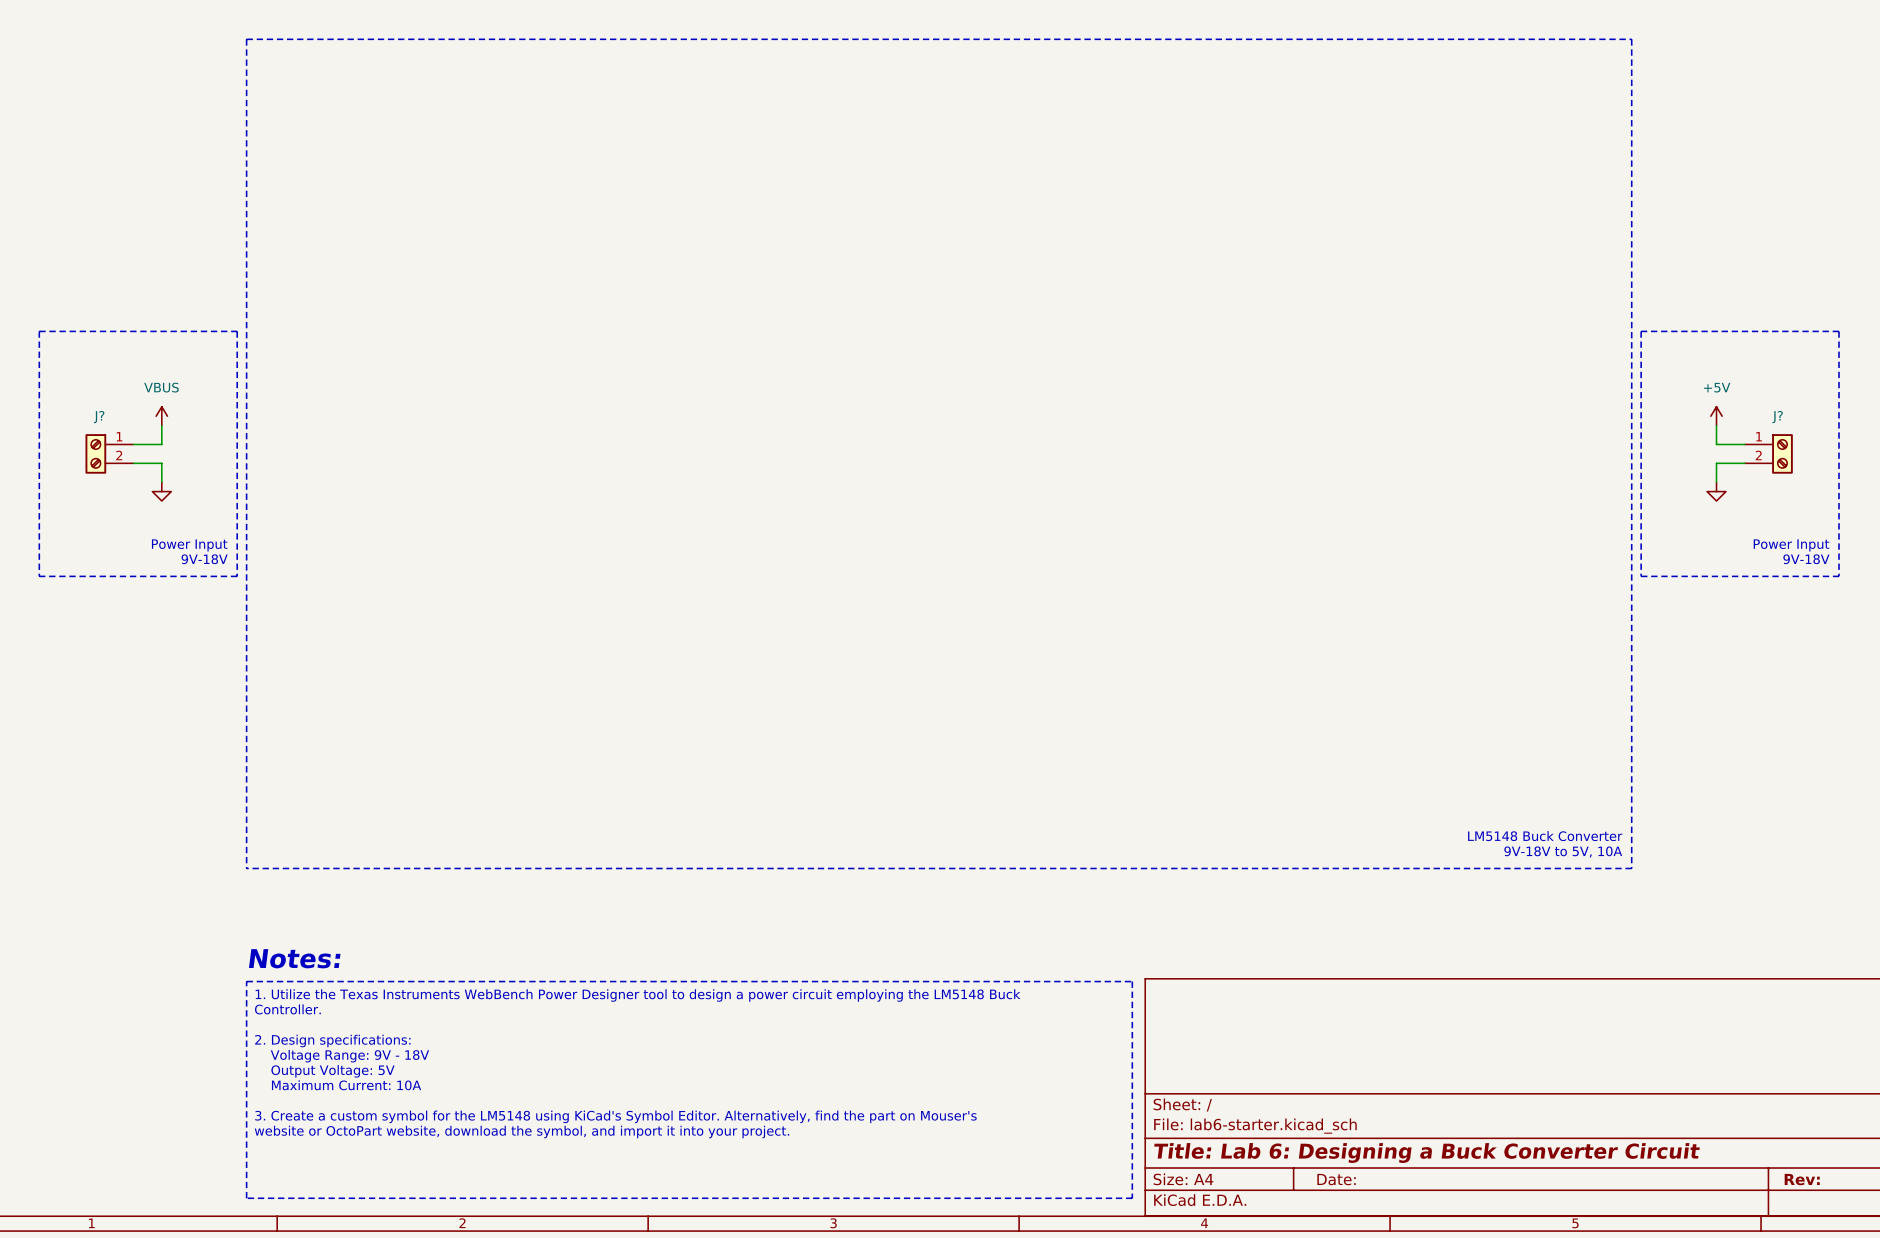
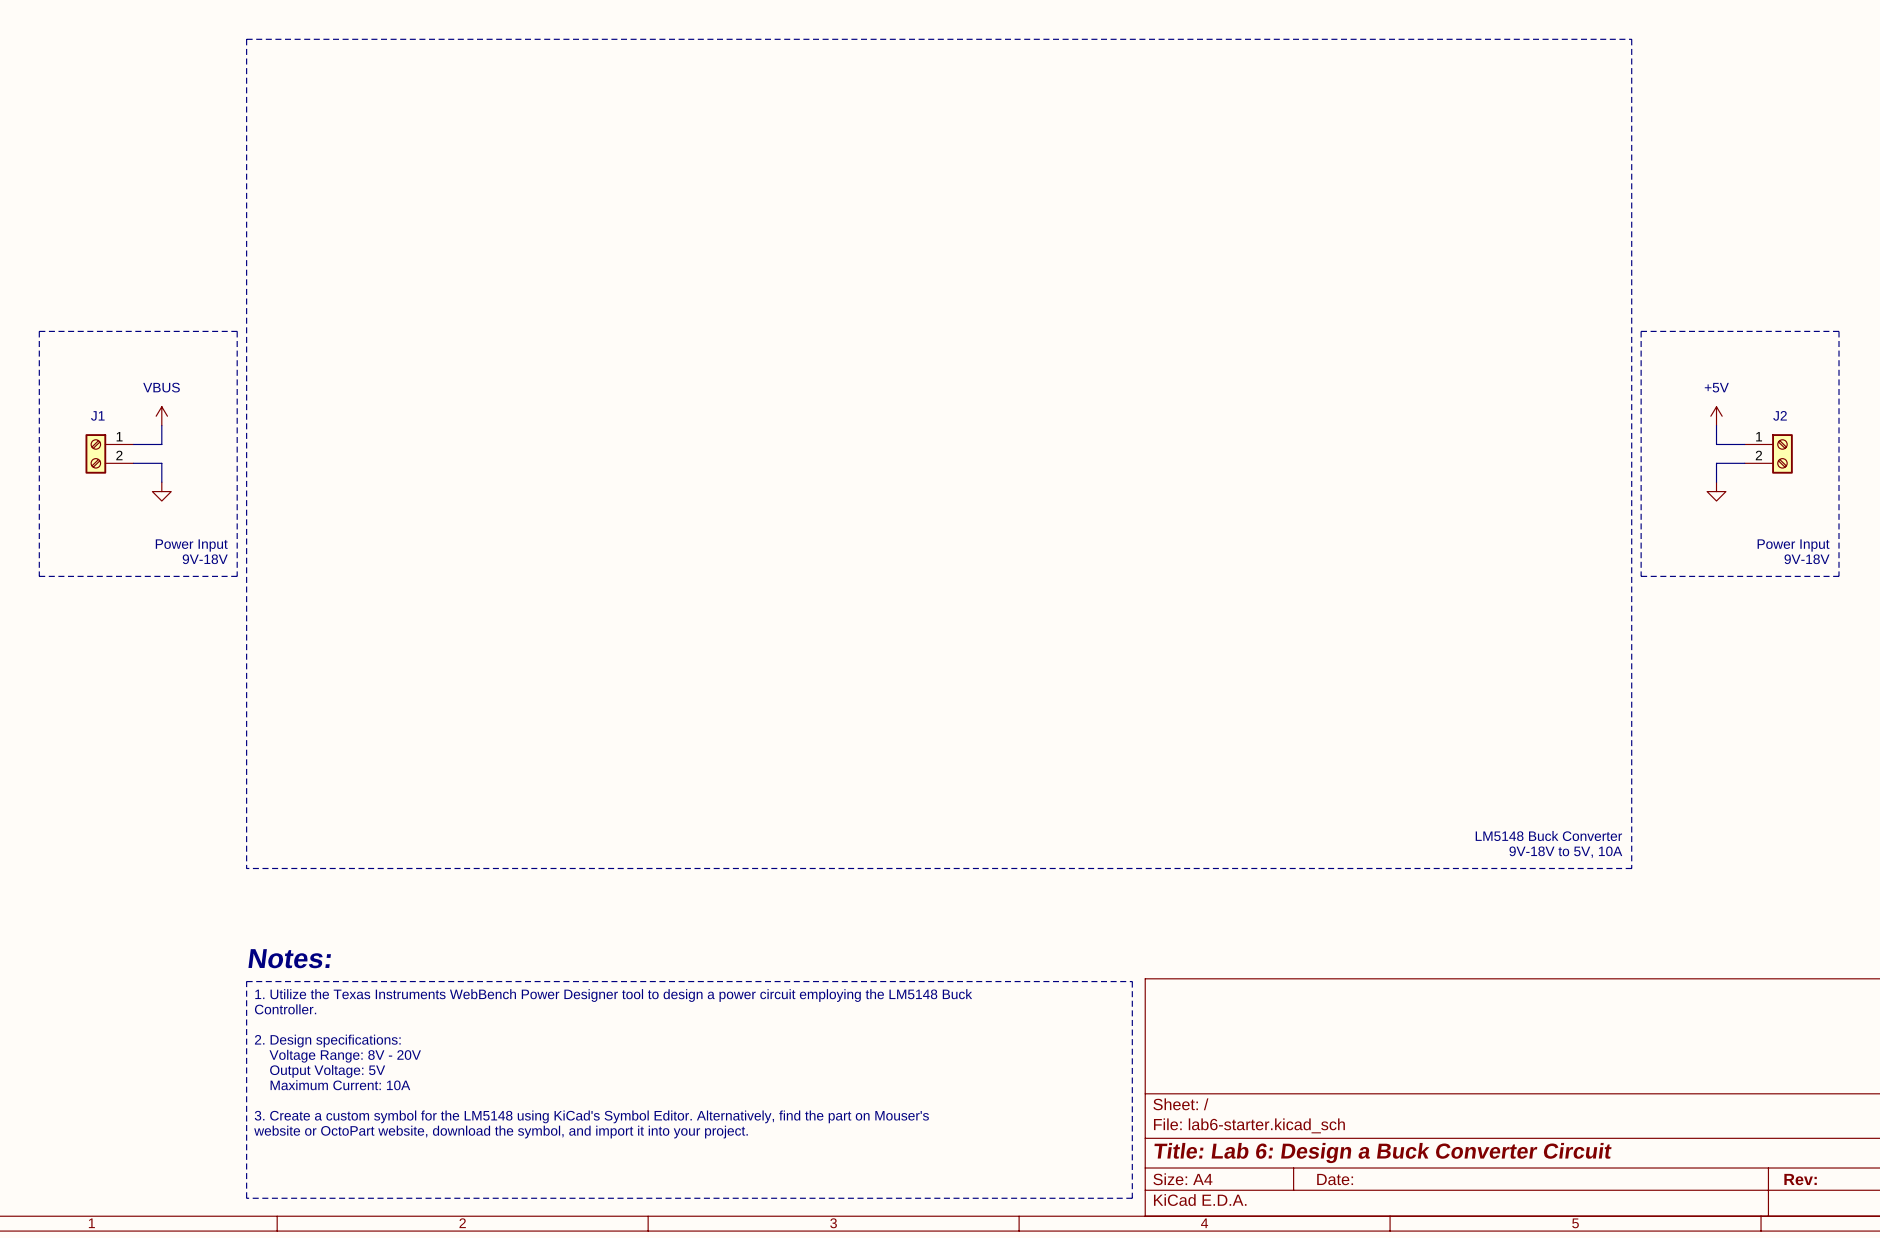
J? name: J? (99, 417) -> J1 (97, 415)
J? name: J? (1777, 417) -> J2 (1780, 415)
text: Voltage Range: 9V - 18V (349, 1056) -> Voltage Range: 8V - 20V (345, 1056)
title block: Title: Lab 6: Designing a Buck Converter Circuit (1427, 1153) -> Title: Lab 6: Design a Buck Converter Circuit (1382, 1153)

